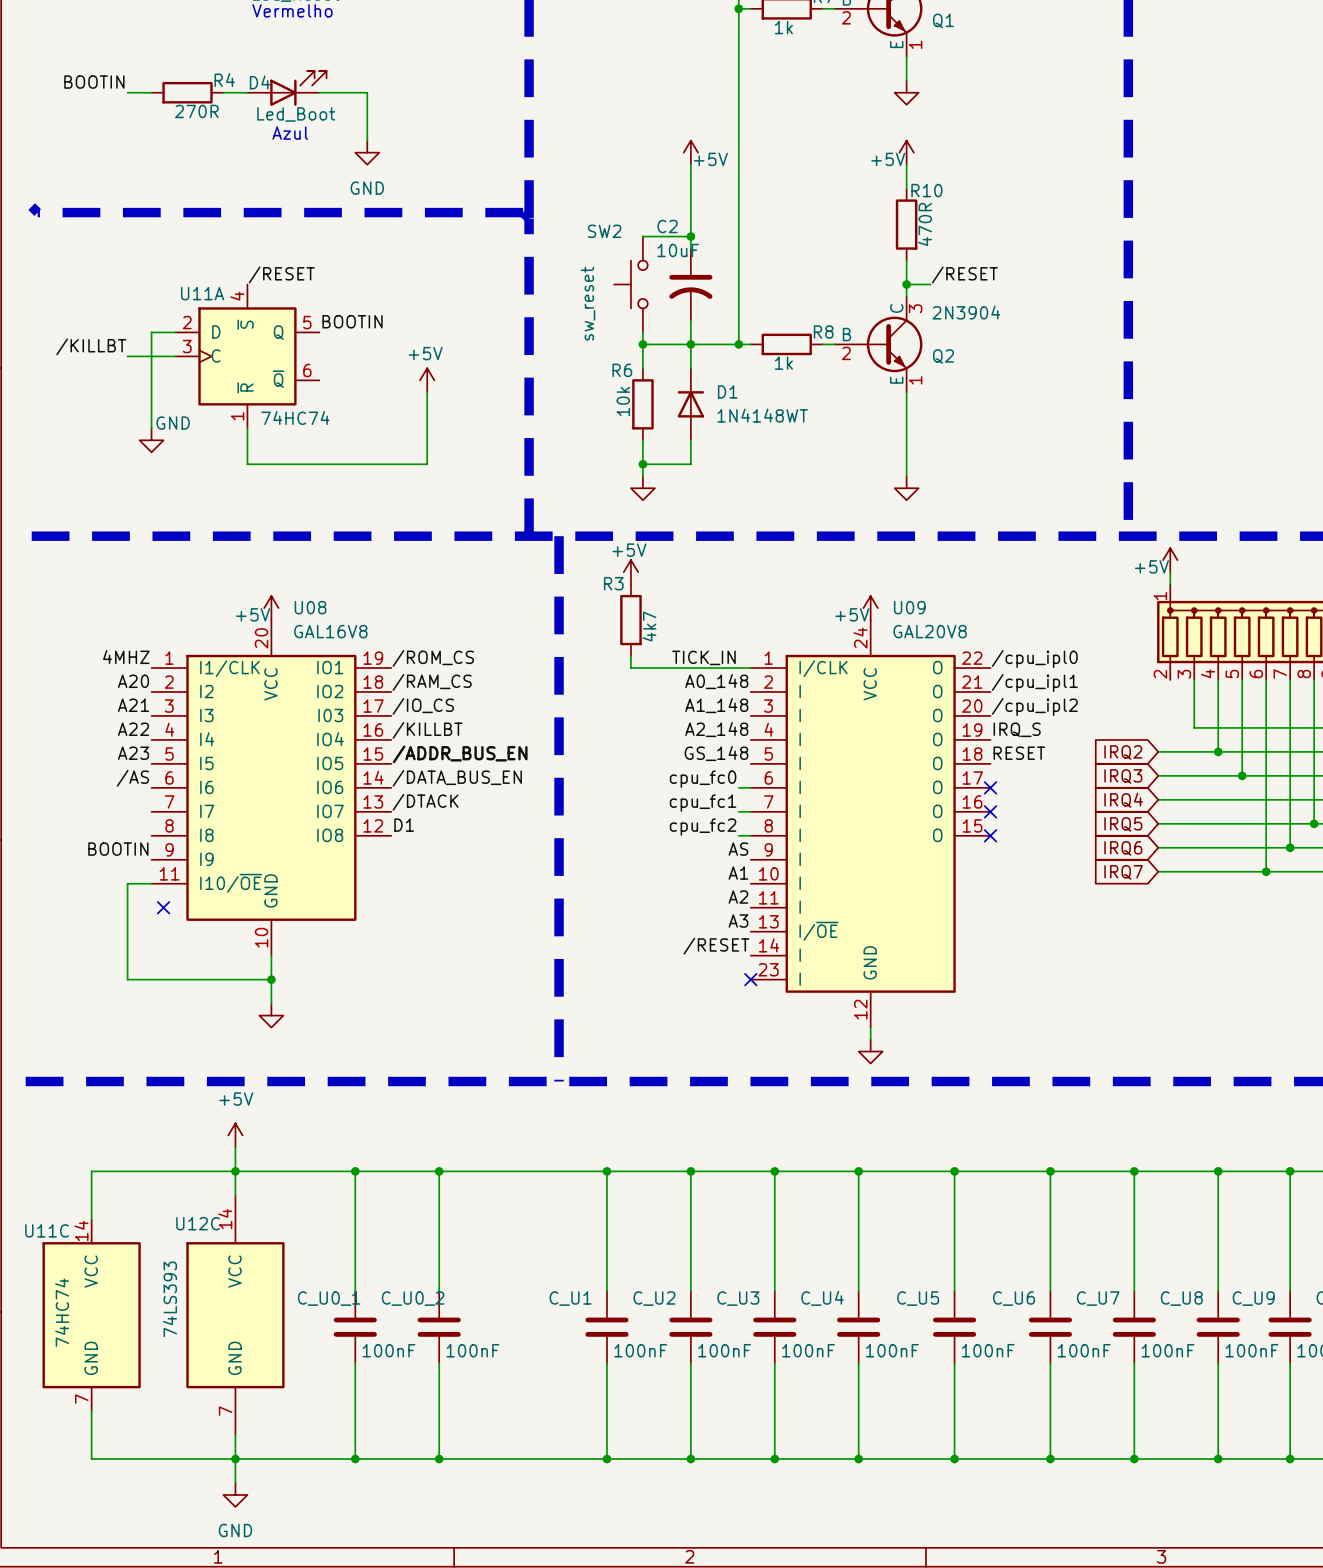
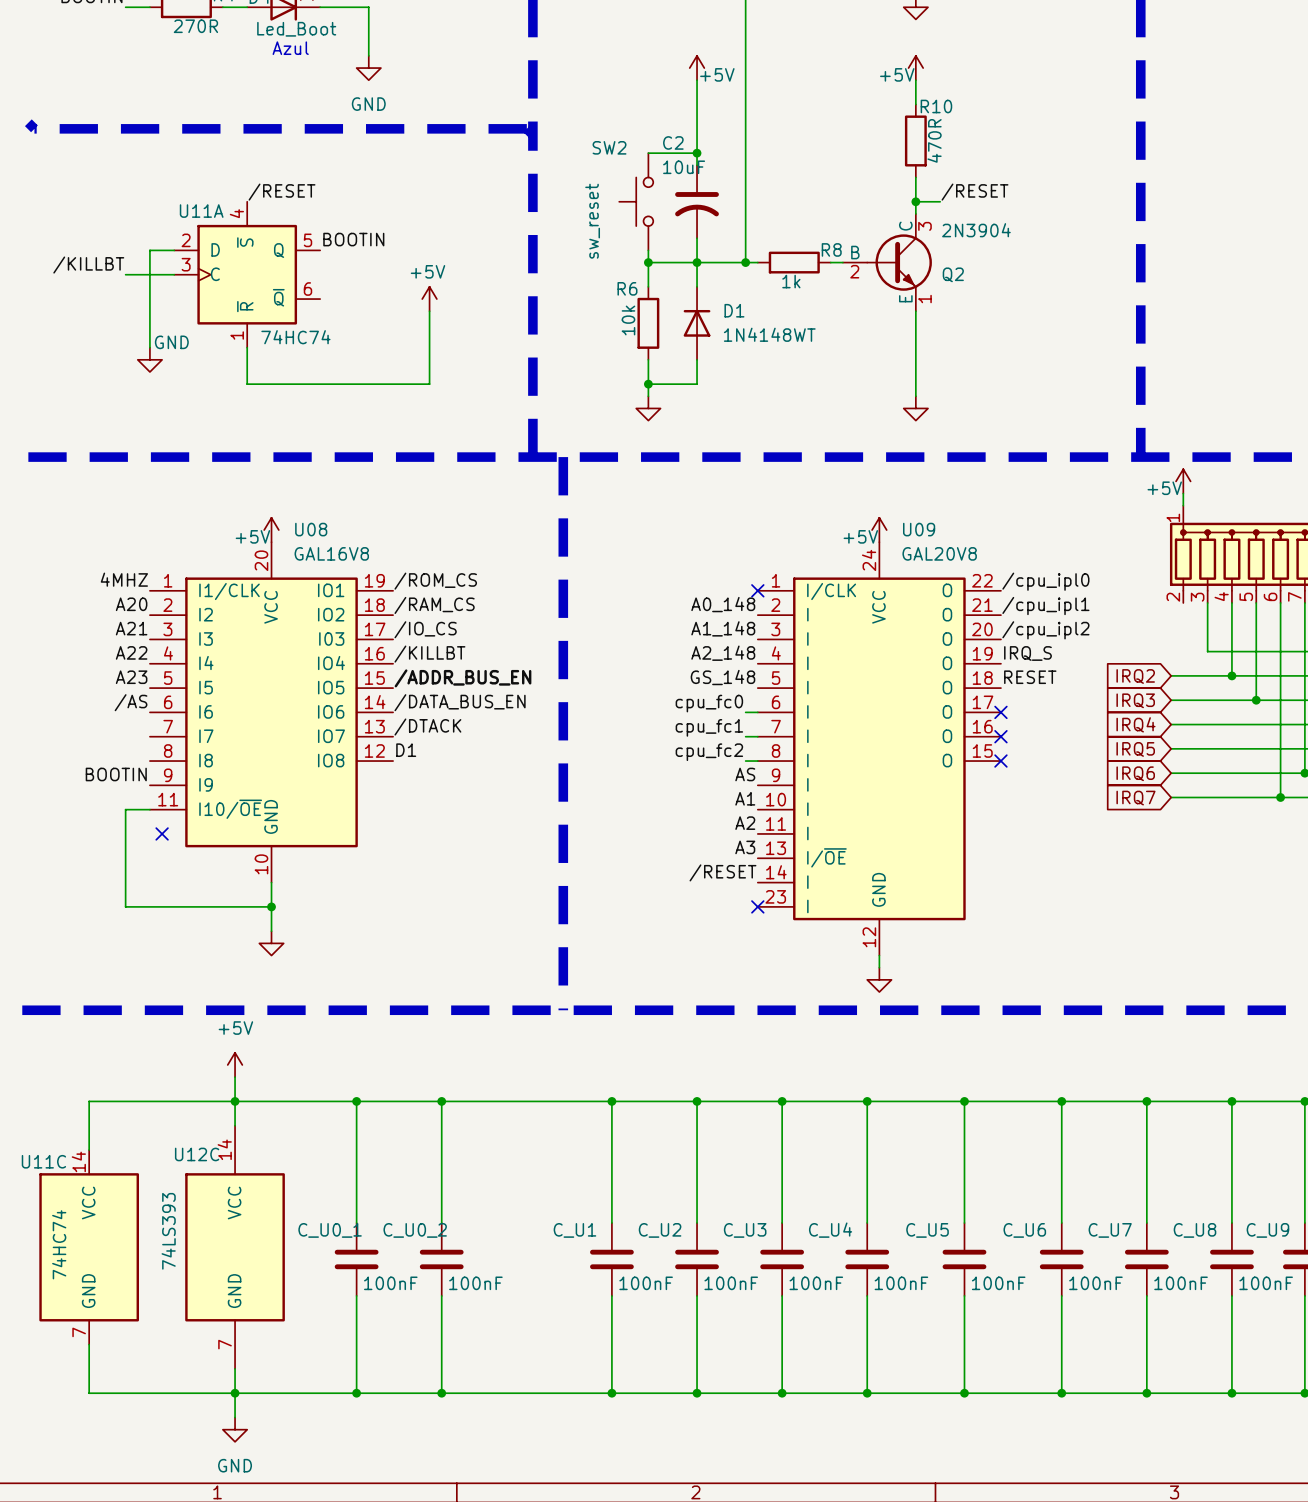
power symbol: +5V (630, 572) -> none
R3: 4k7 (630, 620) -> none
wire: (630, 656) (630, 668) (750, 668) -> none
label: TICK_IN (703, 657) -> none
no-connect mark: none -> (757, 590)

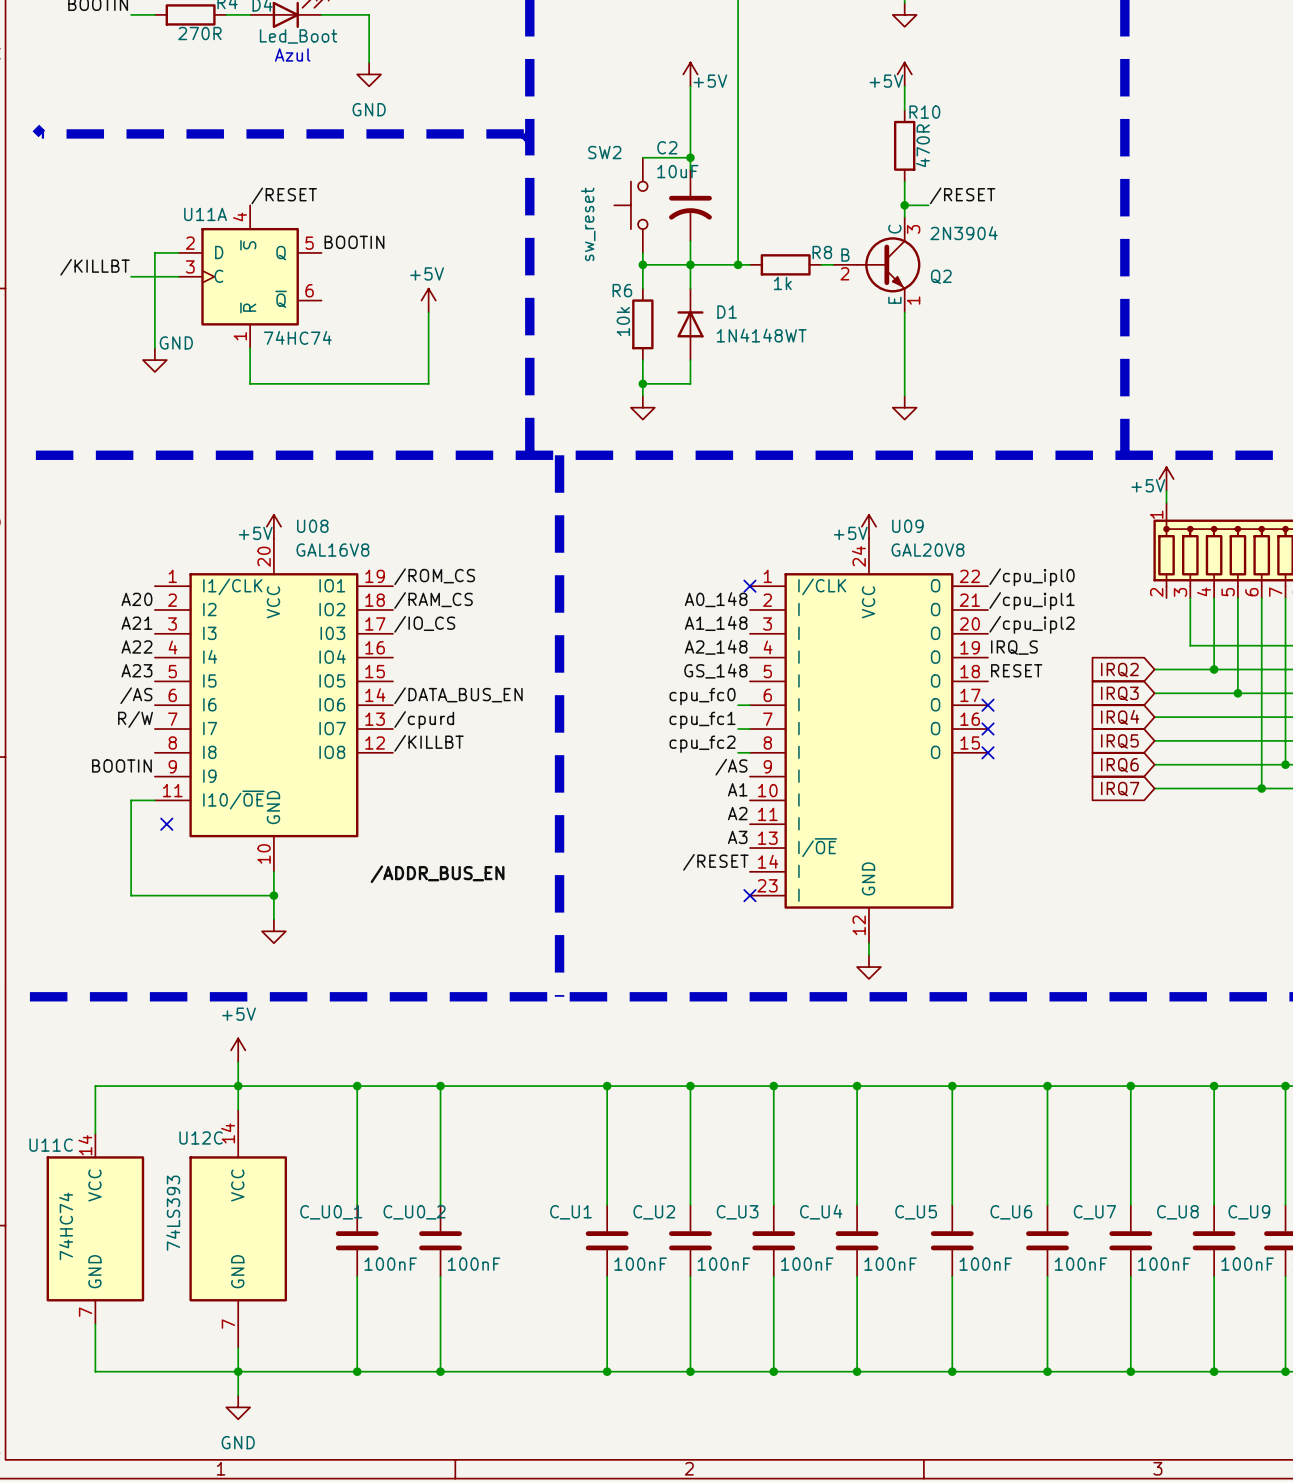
label: 4MHZ (124, 579) -> none
label: /KILLBT (429, 654) -> none
label position: /ADDR_BUS_EN (463, 678) -> /ADDR_BUS_EN (437, 874)
label: none -> R/W (135, 719)
label: /DTACK (427, 727) -> /cpurd (424, 720)
label: D1 (406, 750) -> /KILLBT (429, 743)
label: AS (745, 774) -> /AS (731, 767)

